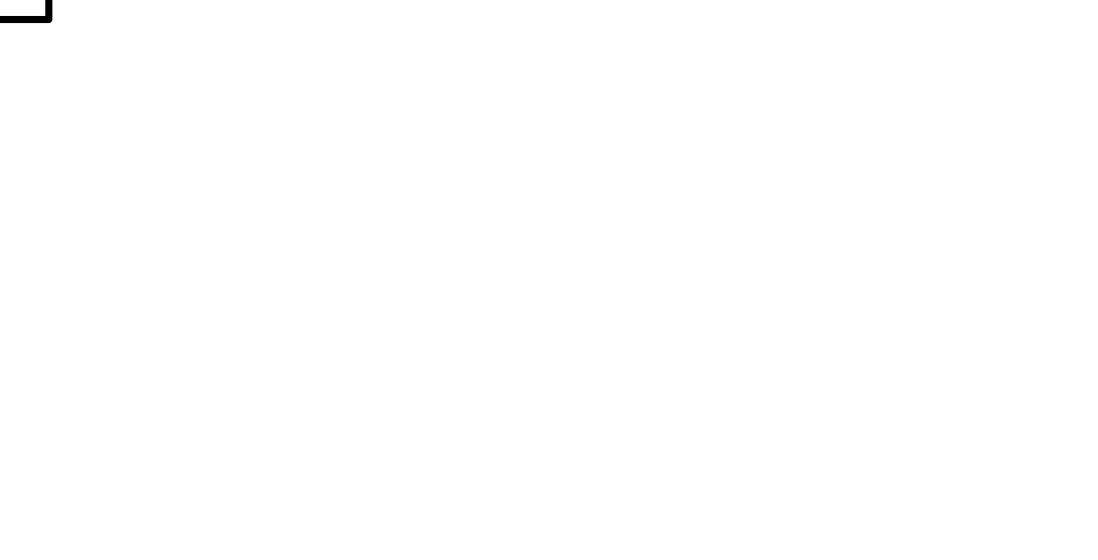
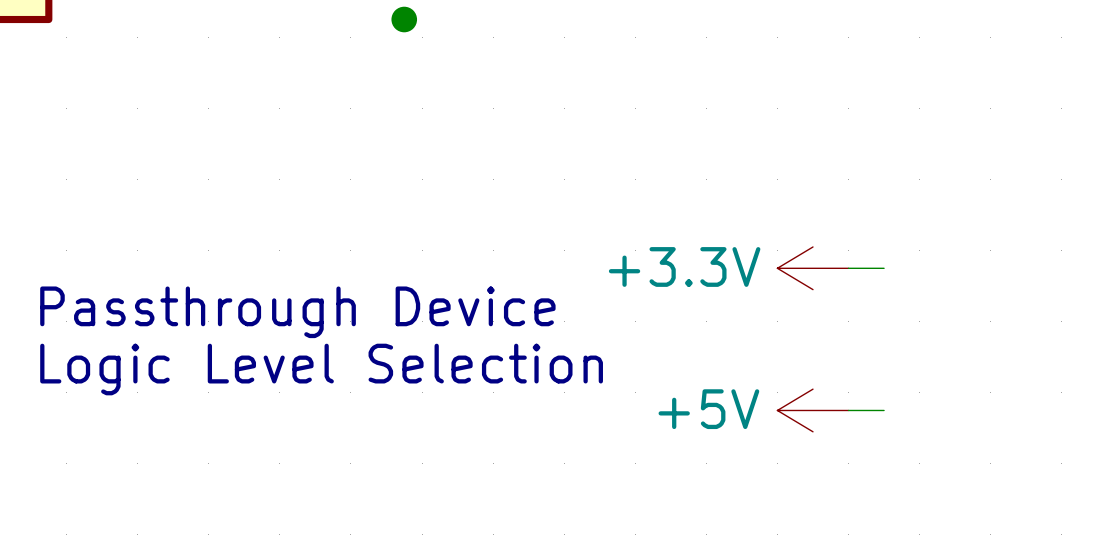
junction: none -> (404, 19)
power symbol: none -> +3.3V (812, 268)
wire: none -> (848, 268) (884, 268)
text: none -> Passthrough Device (297, 312)
text: none -> Logic Level Selection (321, 369)
power symbol: none -> +5V (812, 410)
wire: none -> (848, 410) (884, 410)

